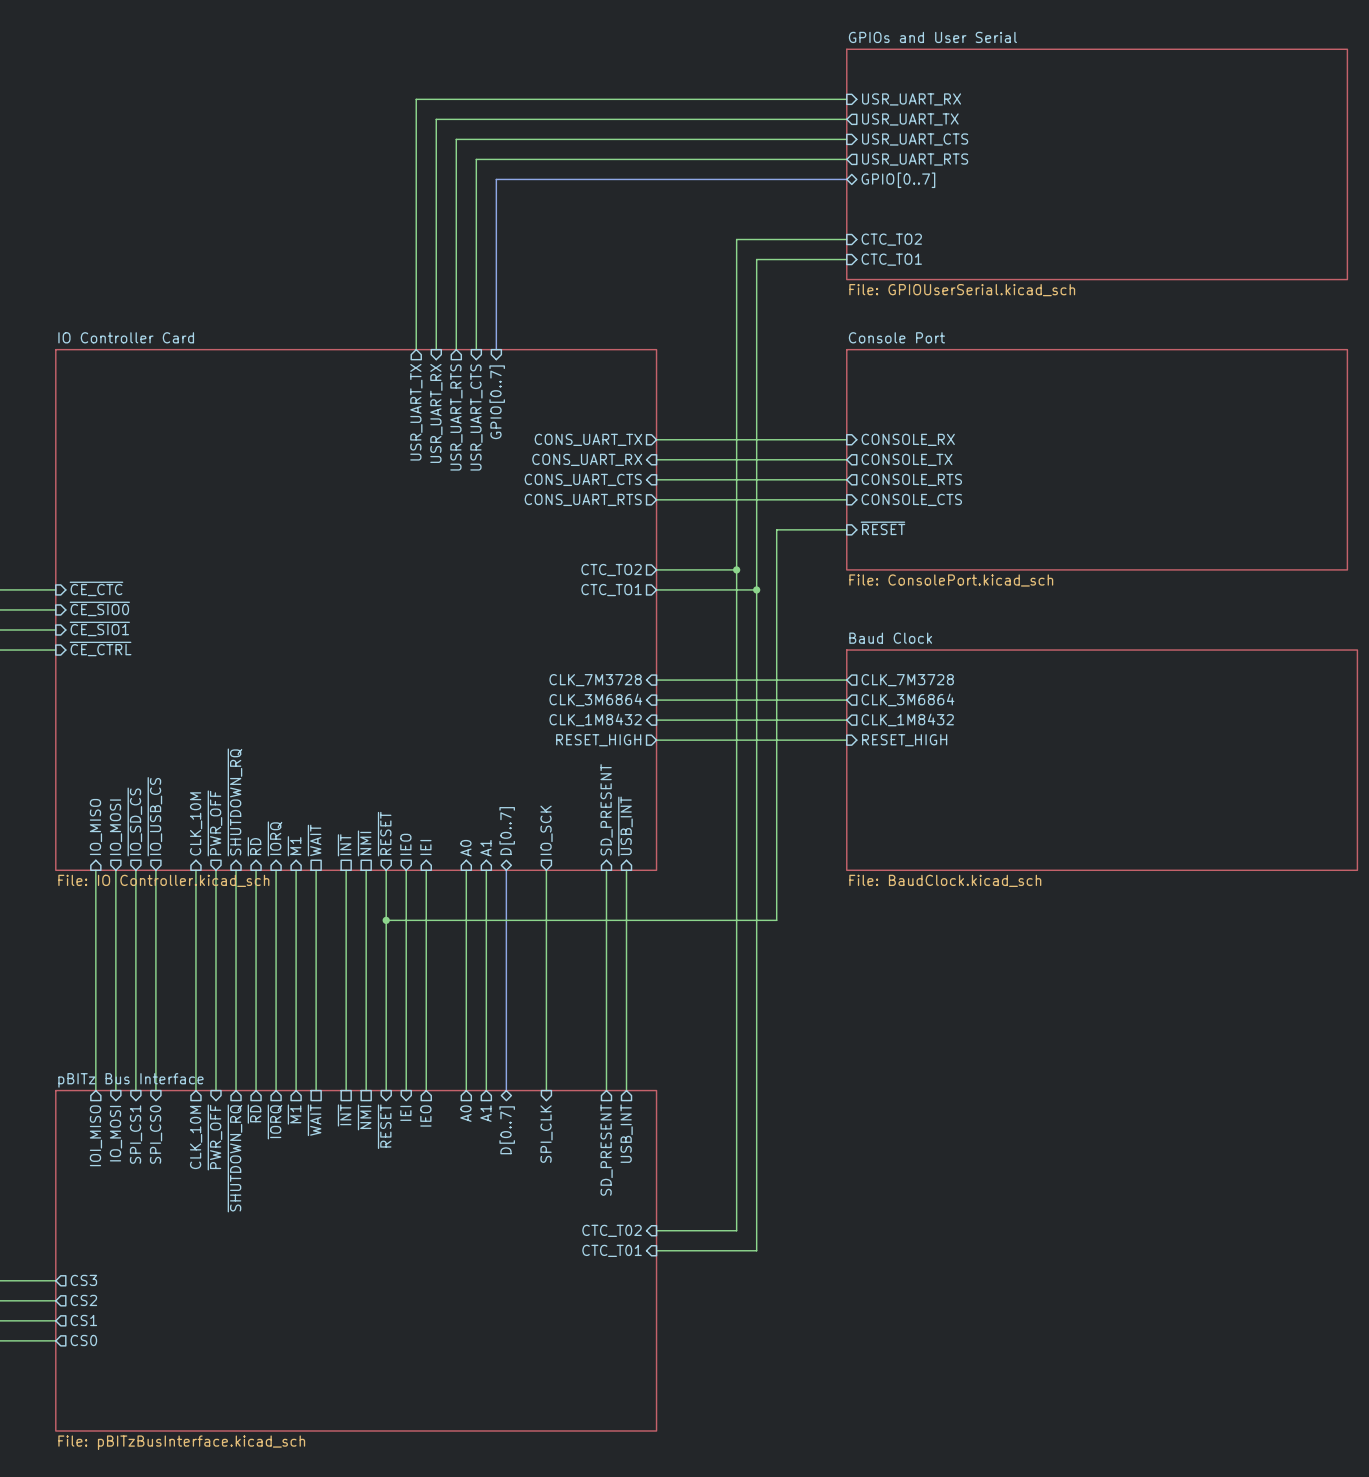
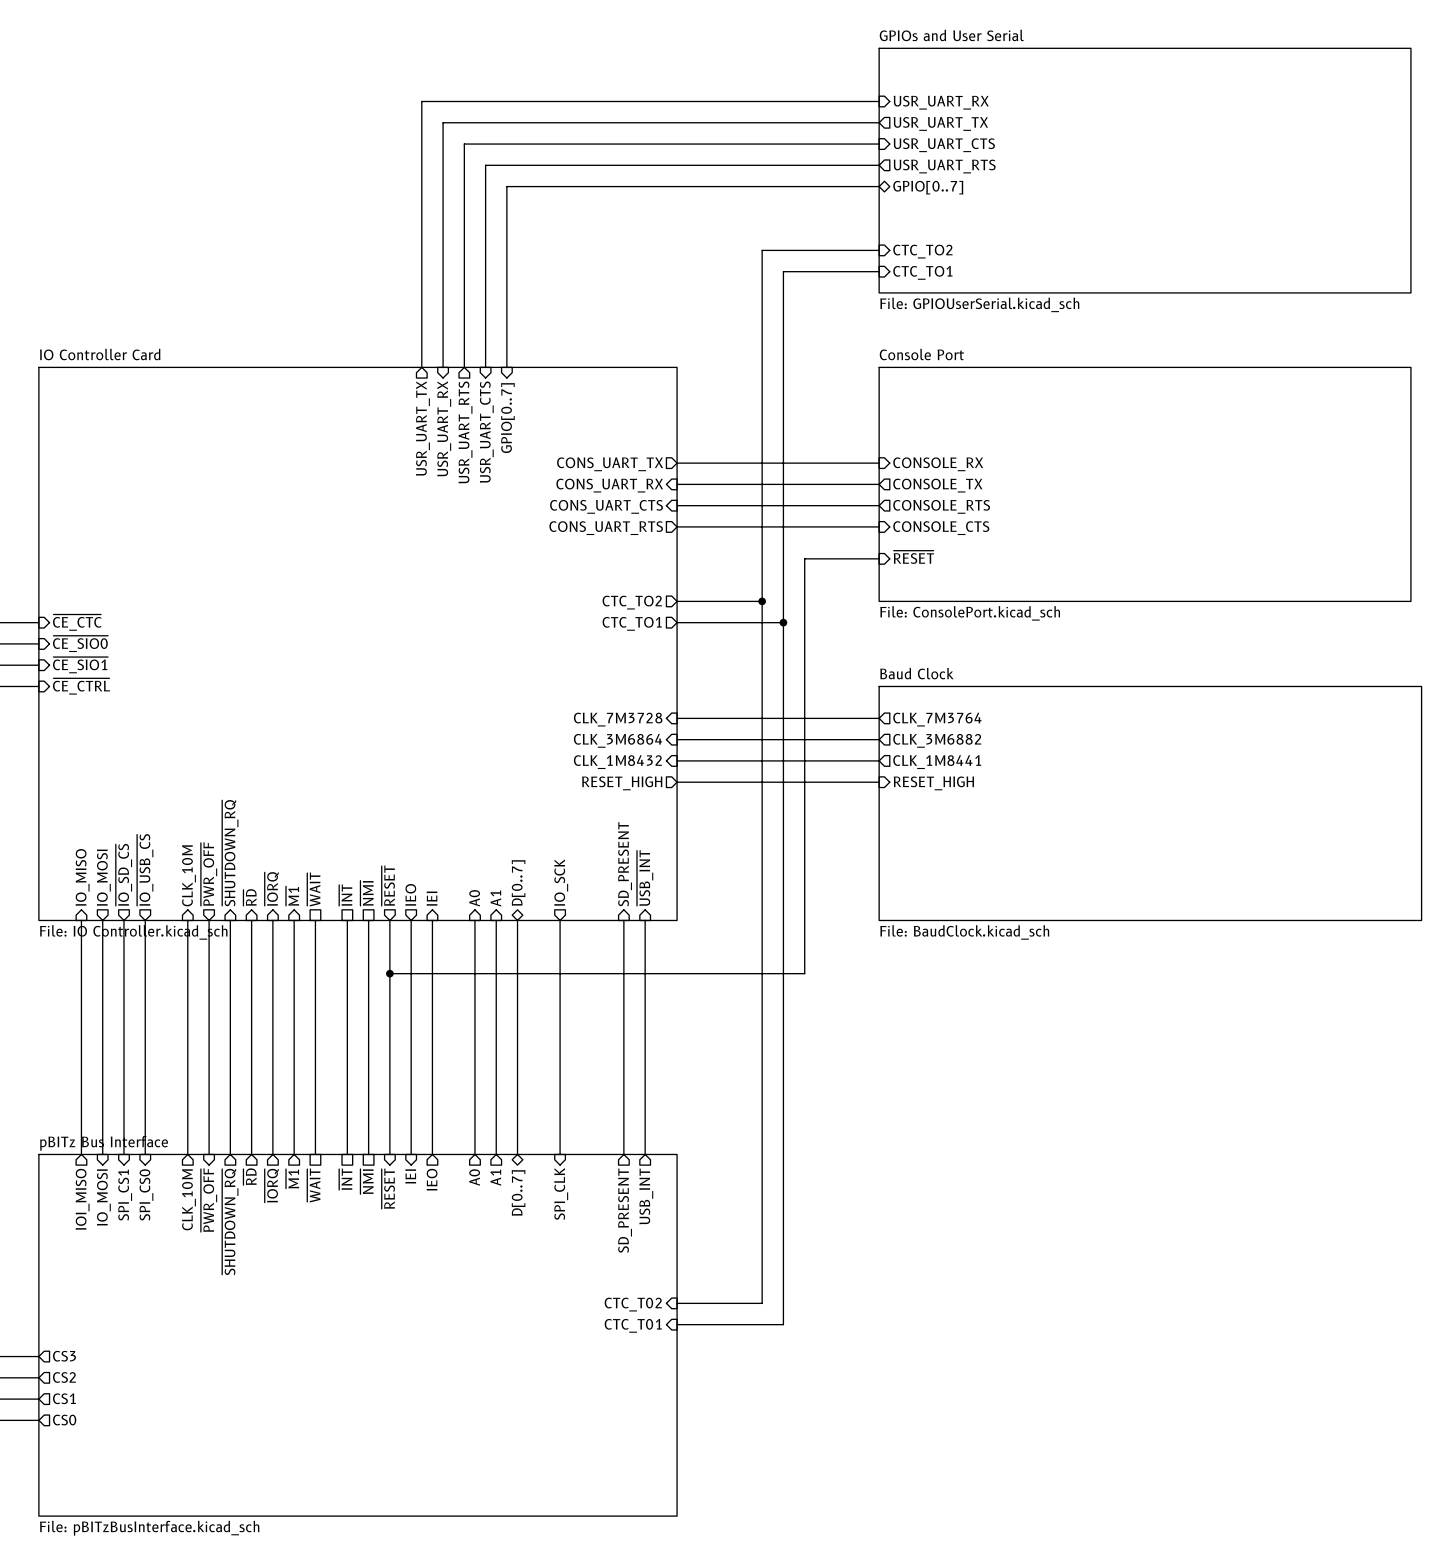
sheet pin: CLK_7M3728 (907, 680) -> CLK_7M3764 (937, 719)
sheet pin: CLK_3M6864 (907, 699) -> CLK_3M6882 (937, 740)
sheet pin: CLK_1M8432 (907, 719) -> CLK_1M8441 (937, 762)

